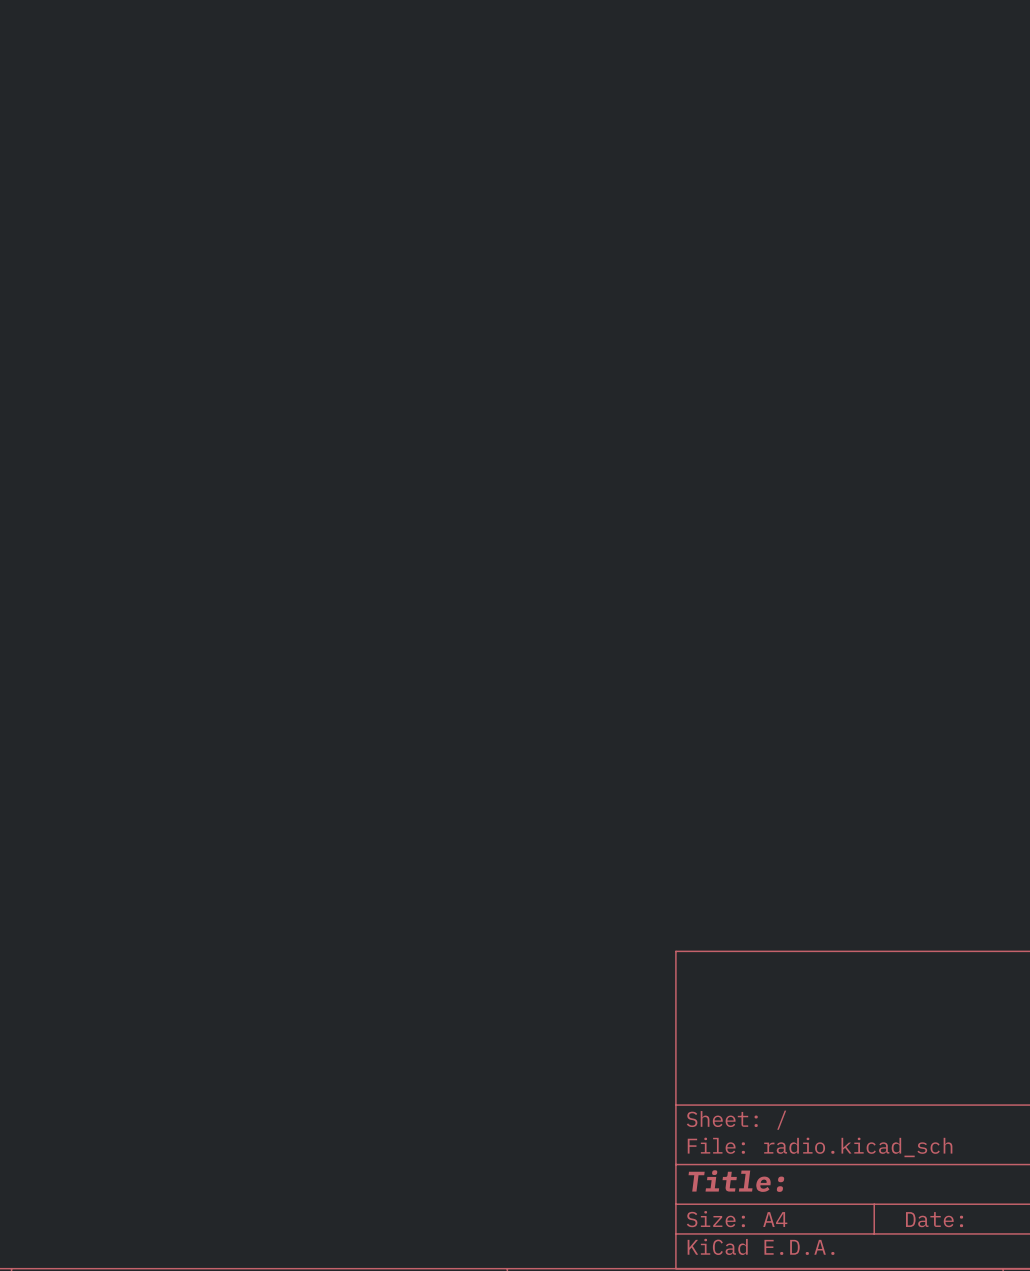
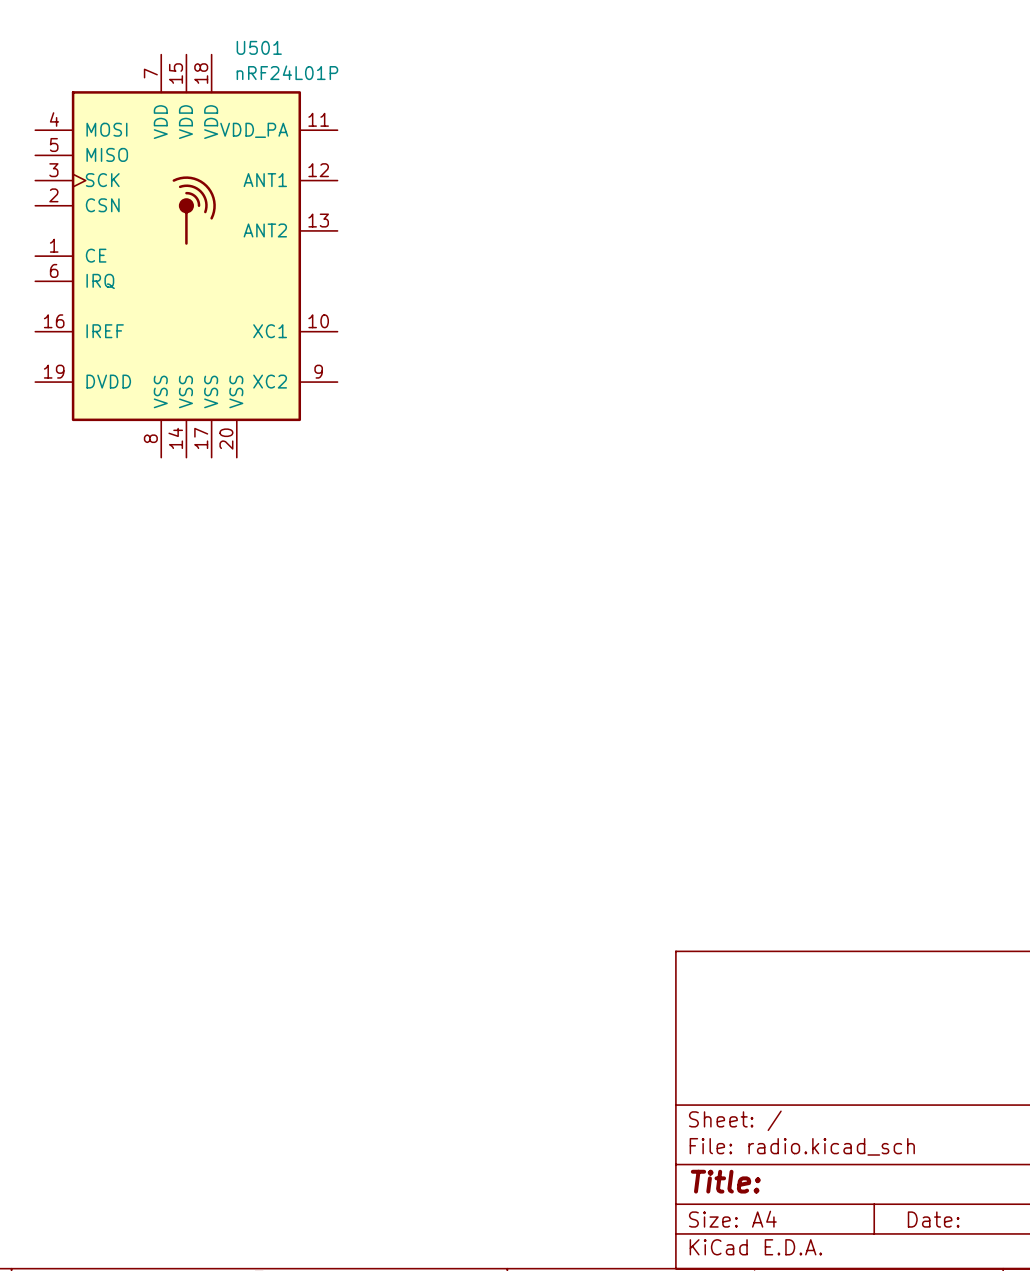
U501: none -> nRF24L01P (186, 256)

